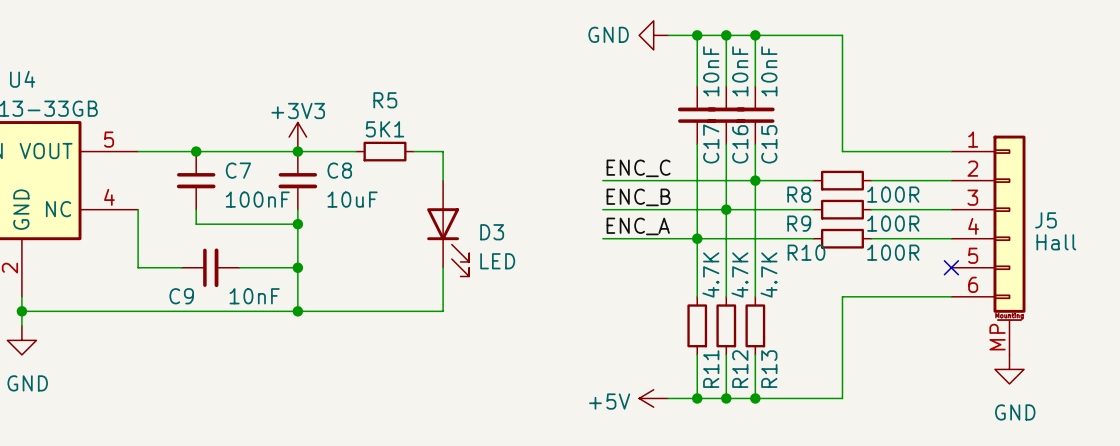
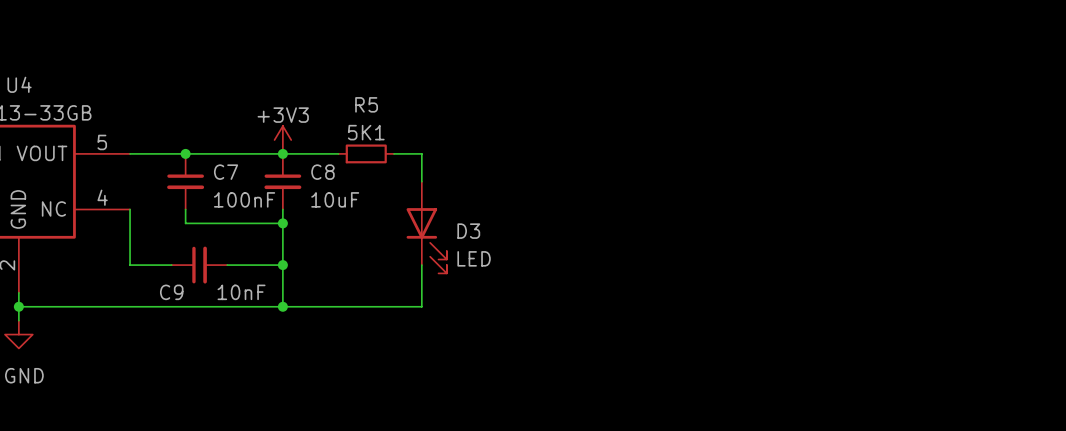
power symbol: GND (653, 35) -> none
wire: (668, 35) (842, 35) (842, 151) (951, 151) -> none
wire: (697, 35) (697, 86) -> none
junction: (697, 35) -> none
wire: (726, 35) (726, 86) -> none
junction: (726, 35) -> none
wire: (755, 35) (755, 86) -> none
junction: (755, 35) -> none
C17: 10nF (697, 115) -> none
C16: 10nF (726, 115) -> none
C15: 10nF (755, 115) -> none
wire: (697, 144) (697, 296) -> none
wire: (726, 144) (726, 296) -> none
wire: (755, 144) (755, 296) -> none
label: ENC_C (638, 168) -> none
wire: (602, 180) (813, 180) -> none
junction: (755, 180) -> none
R8: 100R (842, 180) -> none
wire: (871, 180) (951, 180) -> none
label: ENC_B (638, 197) -> none
wire: (602, 209) (813, 209) -> none
junction: (726, 209) -> none
R9: 100R (842, 209) -> none
wire: (871, 209) (951, 209) -> none
label: ENC_A (638, 226) -> none
wire: (602, 238) (813, 238) -> none
junction: (697, 238) -> none
R10: 100R (842, 238) -> none
wire: (871, 238) (951, 238) -> none
J5: Hall (988, 245) -> none
no-connect mark: (951, 267) -> none
wire: (951, 296) (842, 296) (842, 398) (668, 398) -> none
R11: 4.7K (697, 325) -> none
R12: 4.7K (726, 325) -> none
R13: 4.7K (755, 325) -> none
wire: (697, 354) (697, 398) -> none
wire: (726, 354) (726, 398) -> none
wire: (755, 354) (755, 398) -> none
power symbol: GND (1009, 369) -> none
power symbol: +5V (653, 398) -> none
junction: (697, 398) -> none
junction: (726, 398) -> none
junction: (755, 398) -> none

